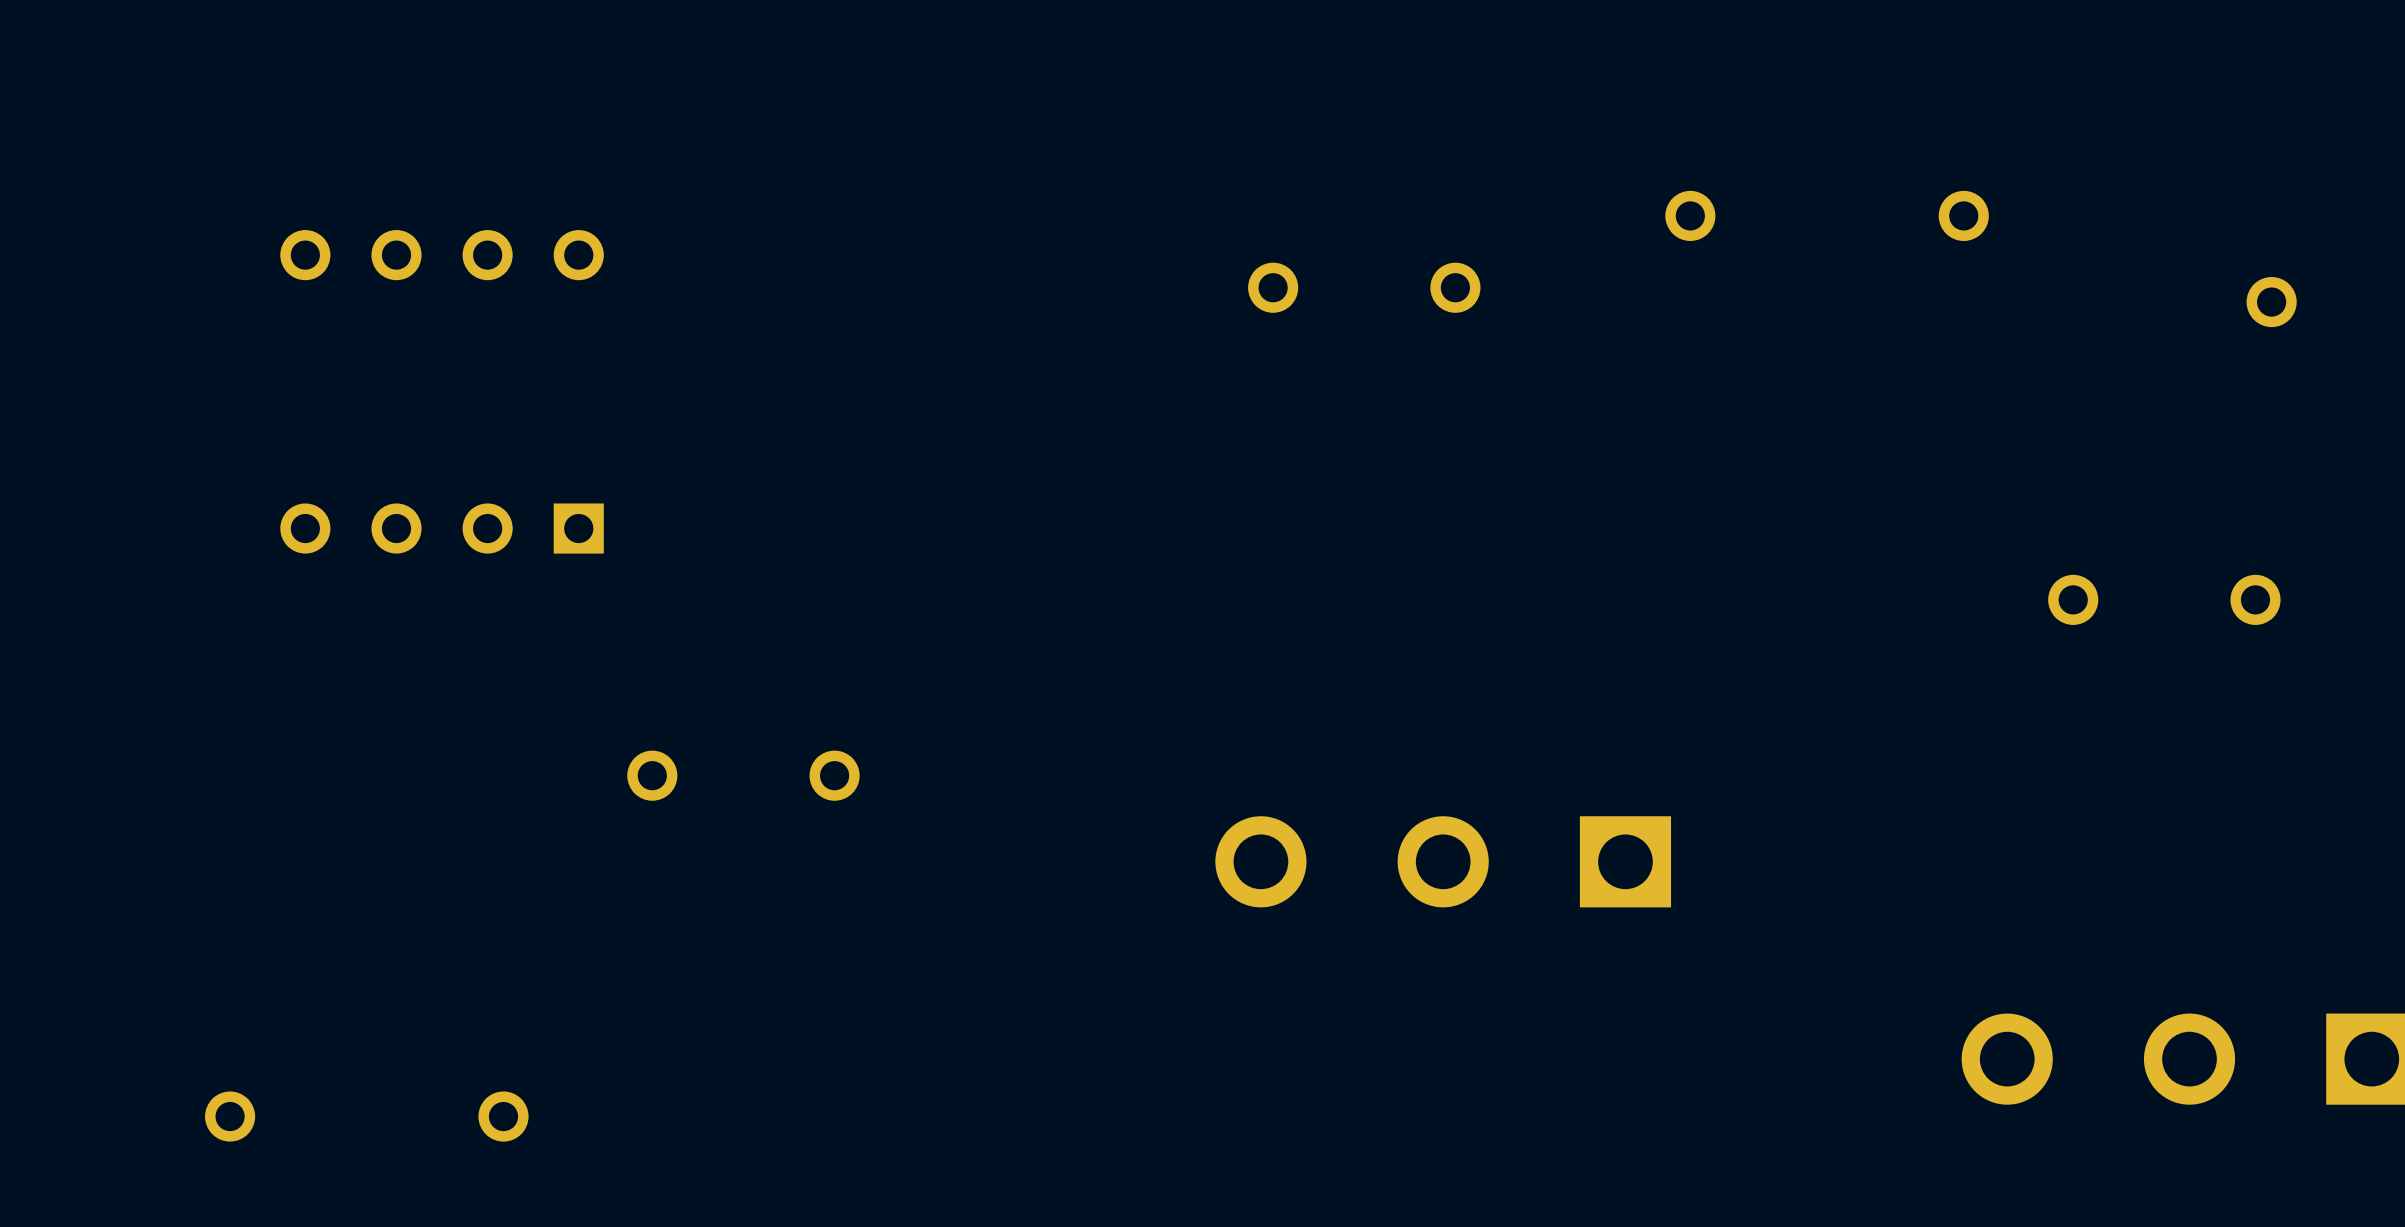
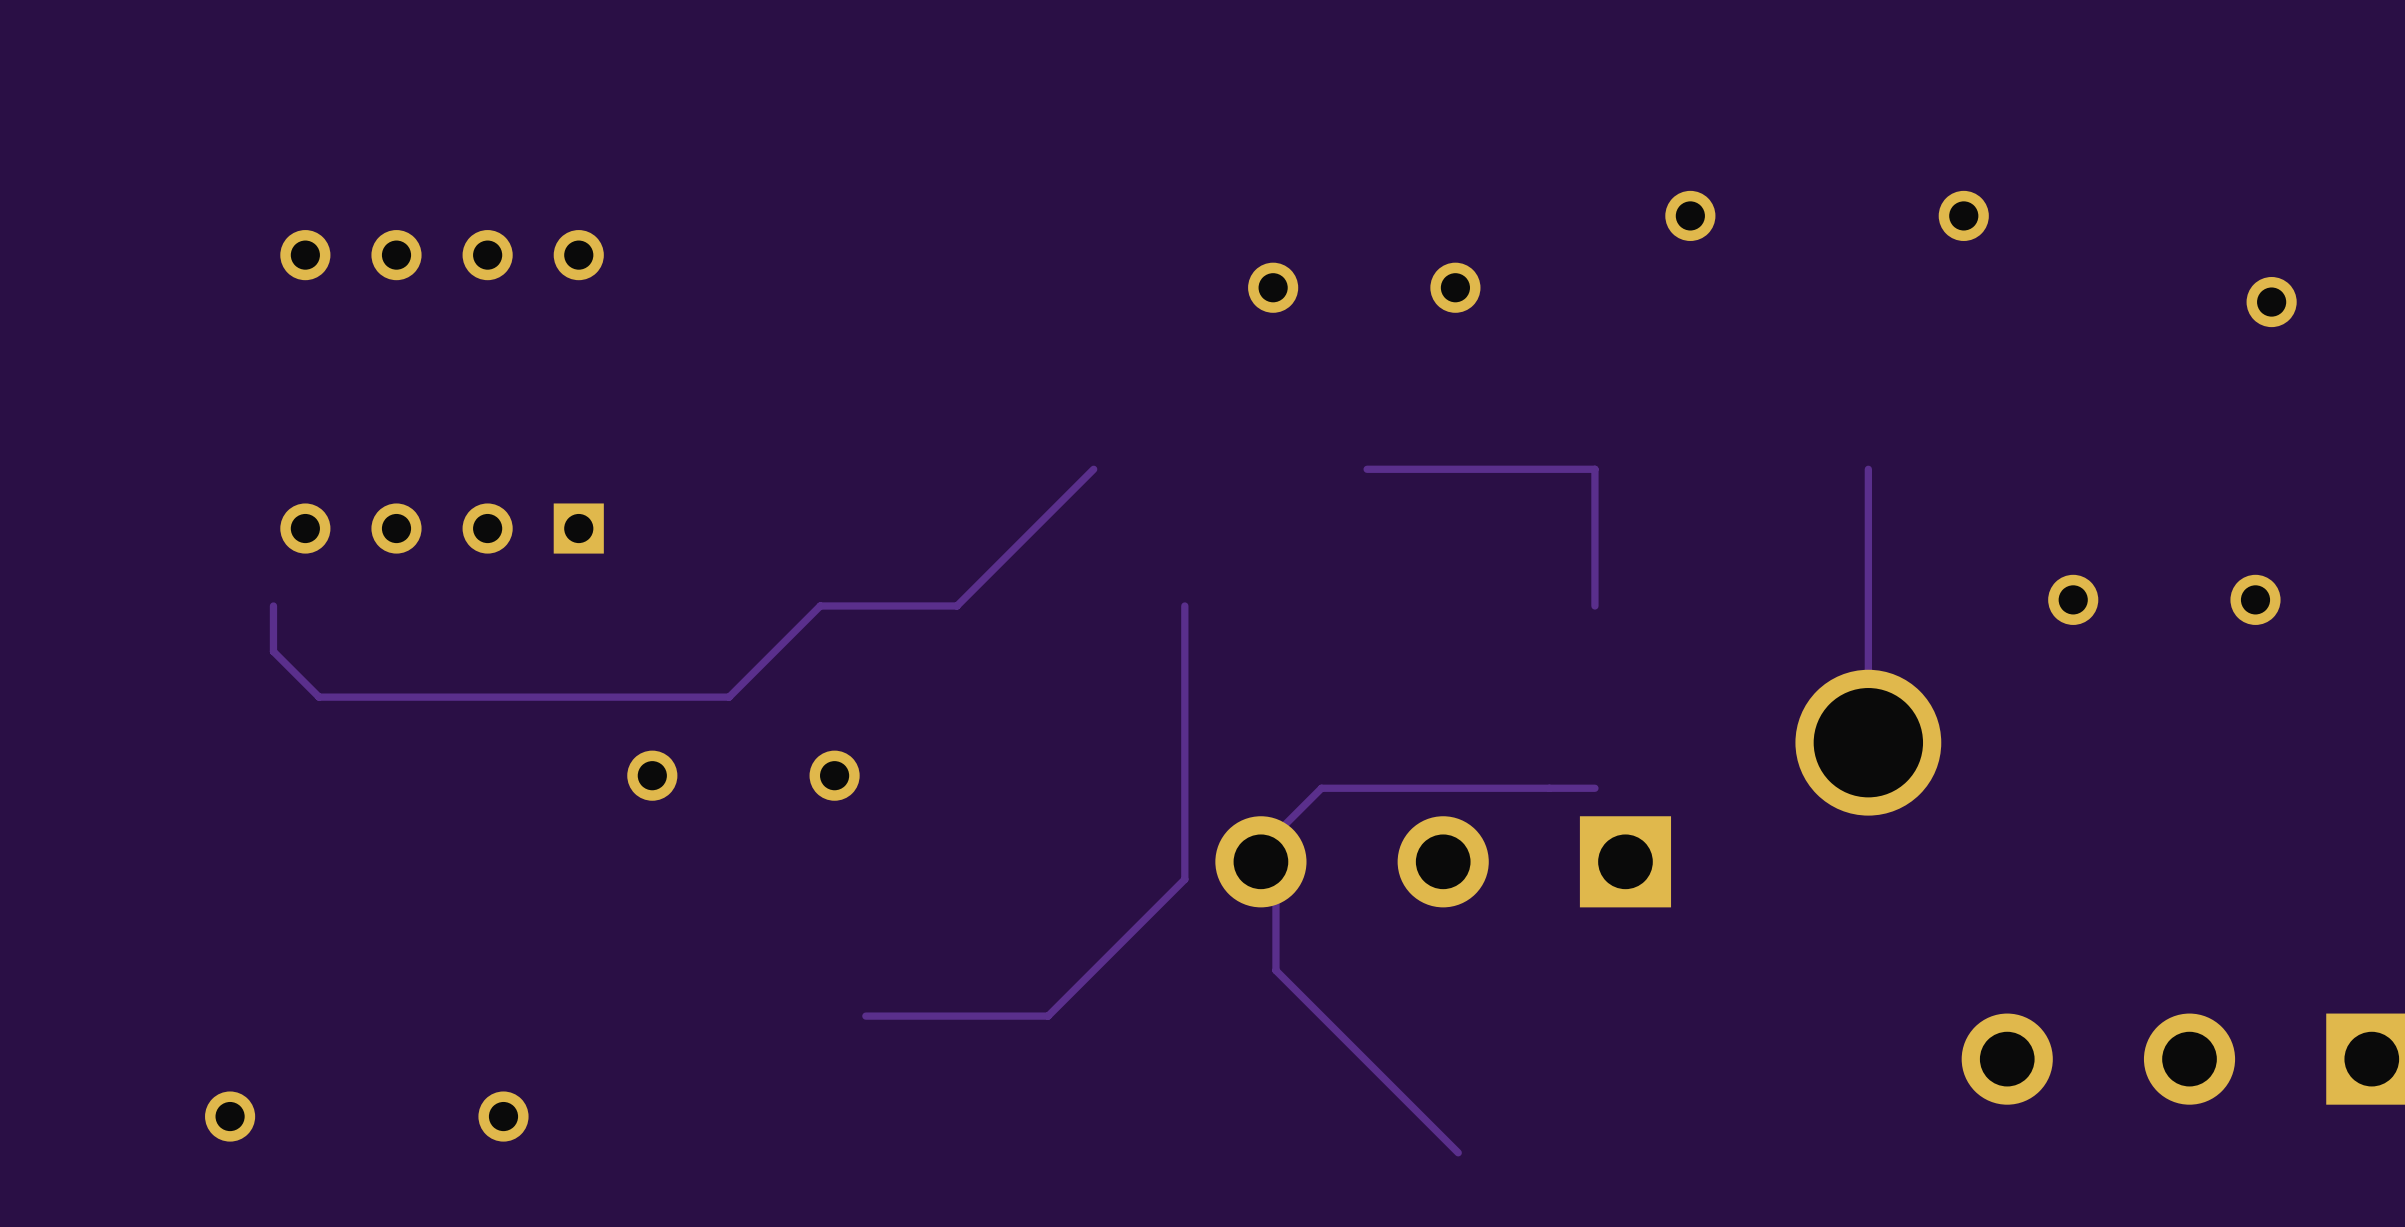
track: none -> (1093, 469) (956, 605) (820, 605) (729, 697) (319, 697) (273, 651) (273, 605)
track: none -> (1367, 469) (1594, 469) (1594, 605)
track: none -> (1868, 469) (1868, 742)
track: none -> (1184, 605) (1184, 879) (1048, 1016) (865, 1016)
part: none -> (1868, 742)
track: none -> (1594, 788) (1321, 788) (1275, 833) (1275, 970) (1458, 1152)

